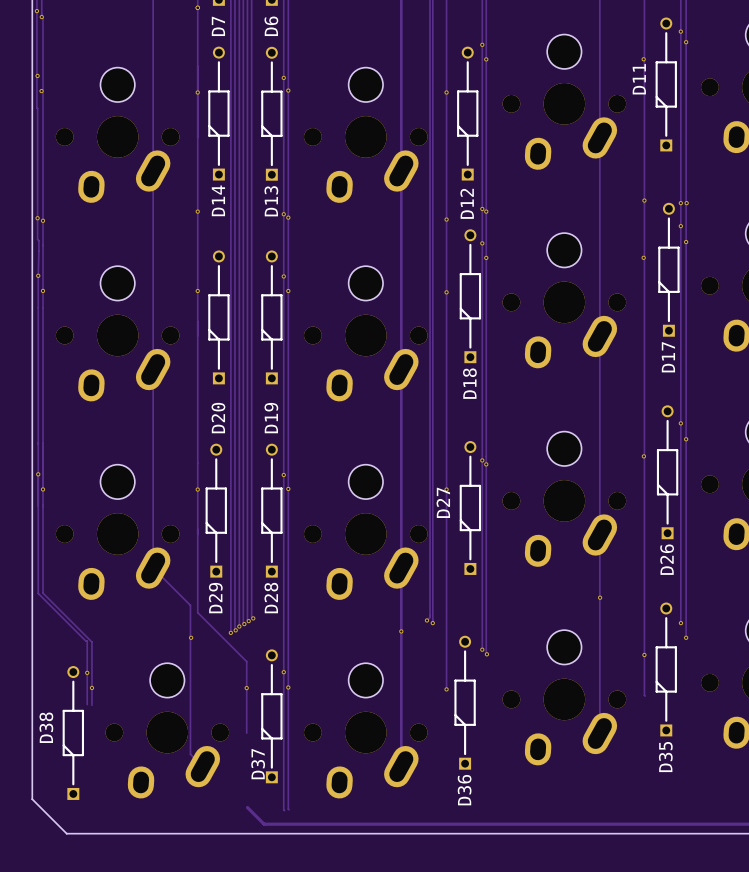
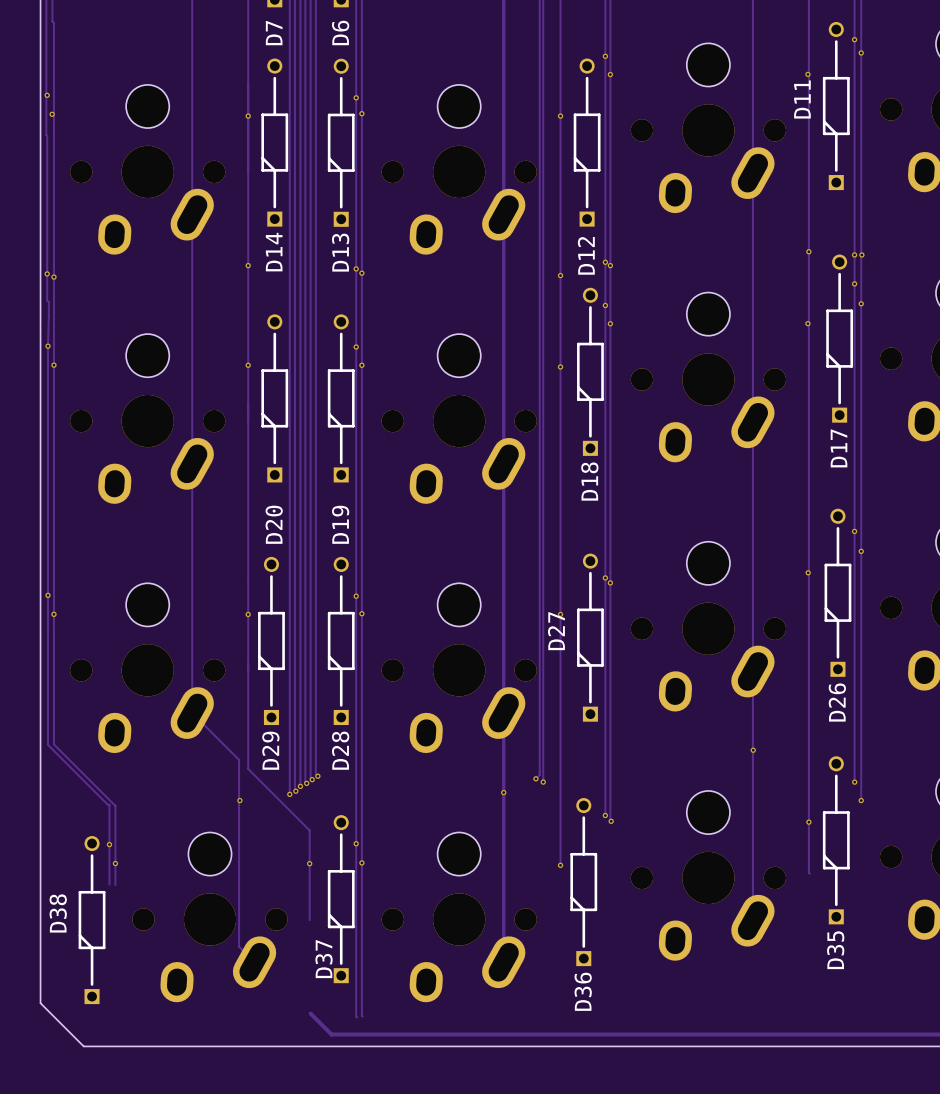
via: (197, 7) -> none
via: (36, 11) -> none
via: (41, 17) -> none

